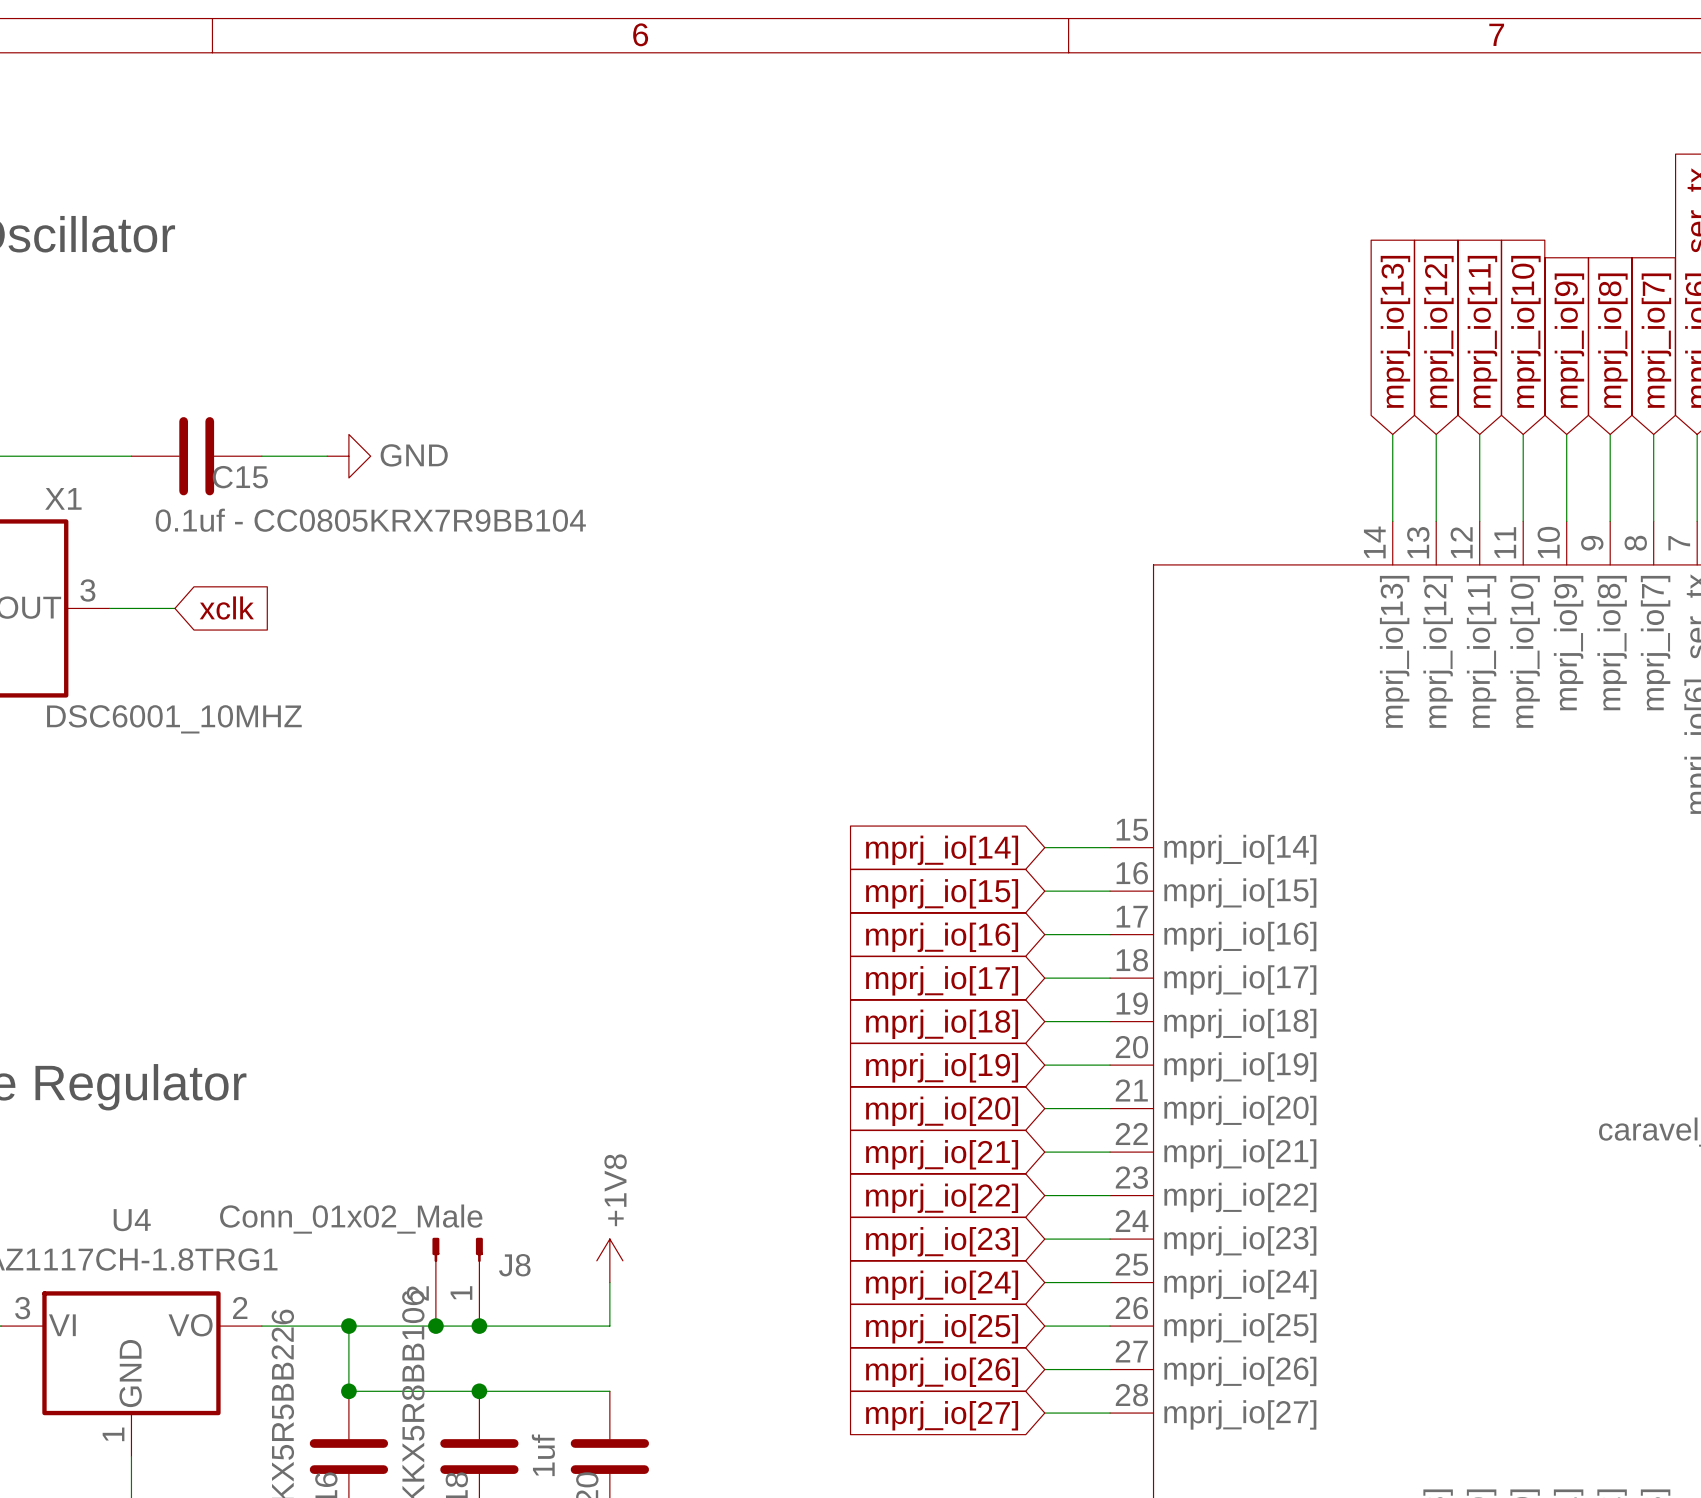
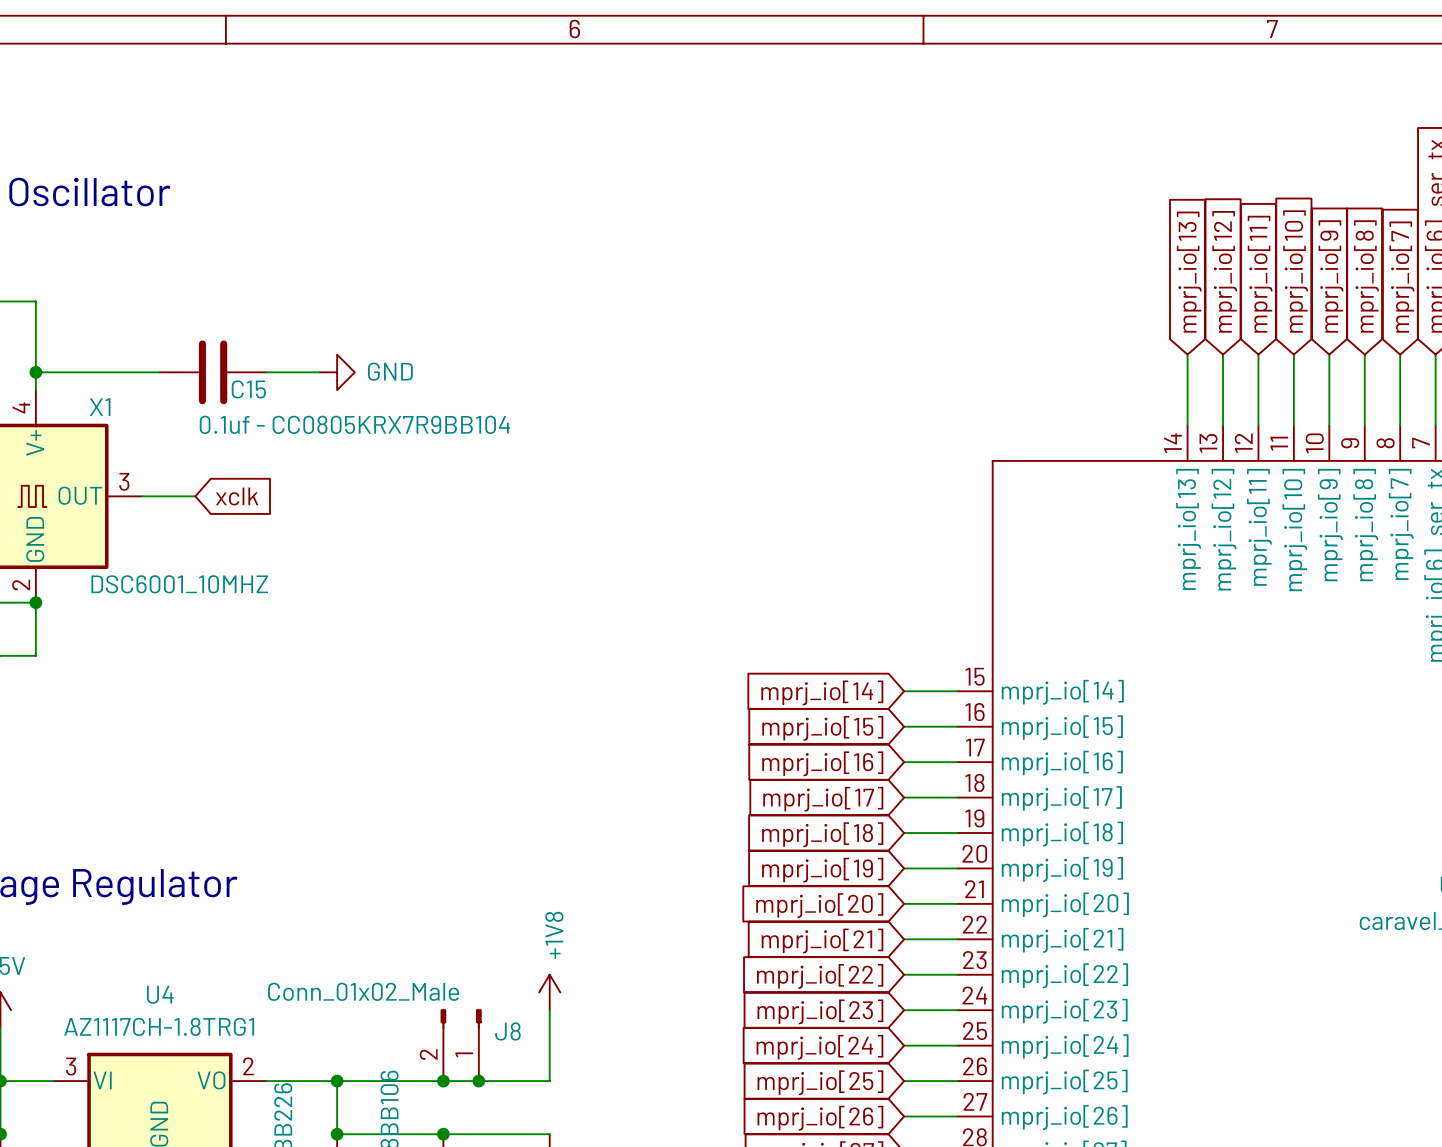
power symbol position: +1V8 (609, 1260) -> +1V8 (549, 992)
J8 position: (457, 1281) -> (461, 1045)
junction position: (435, 1326) -> (478, 1081)

